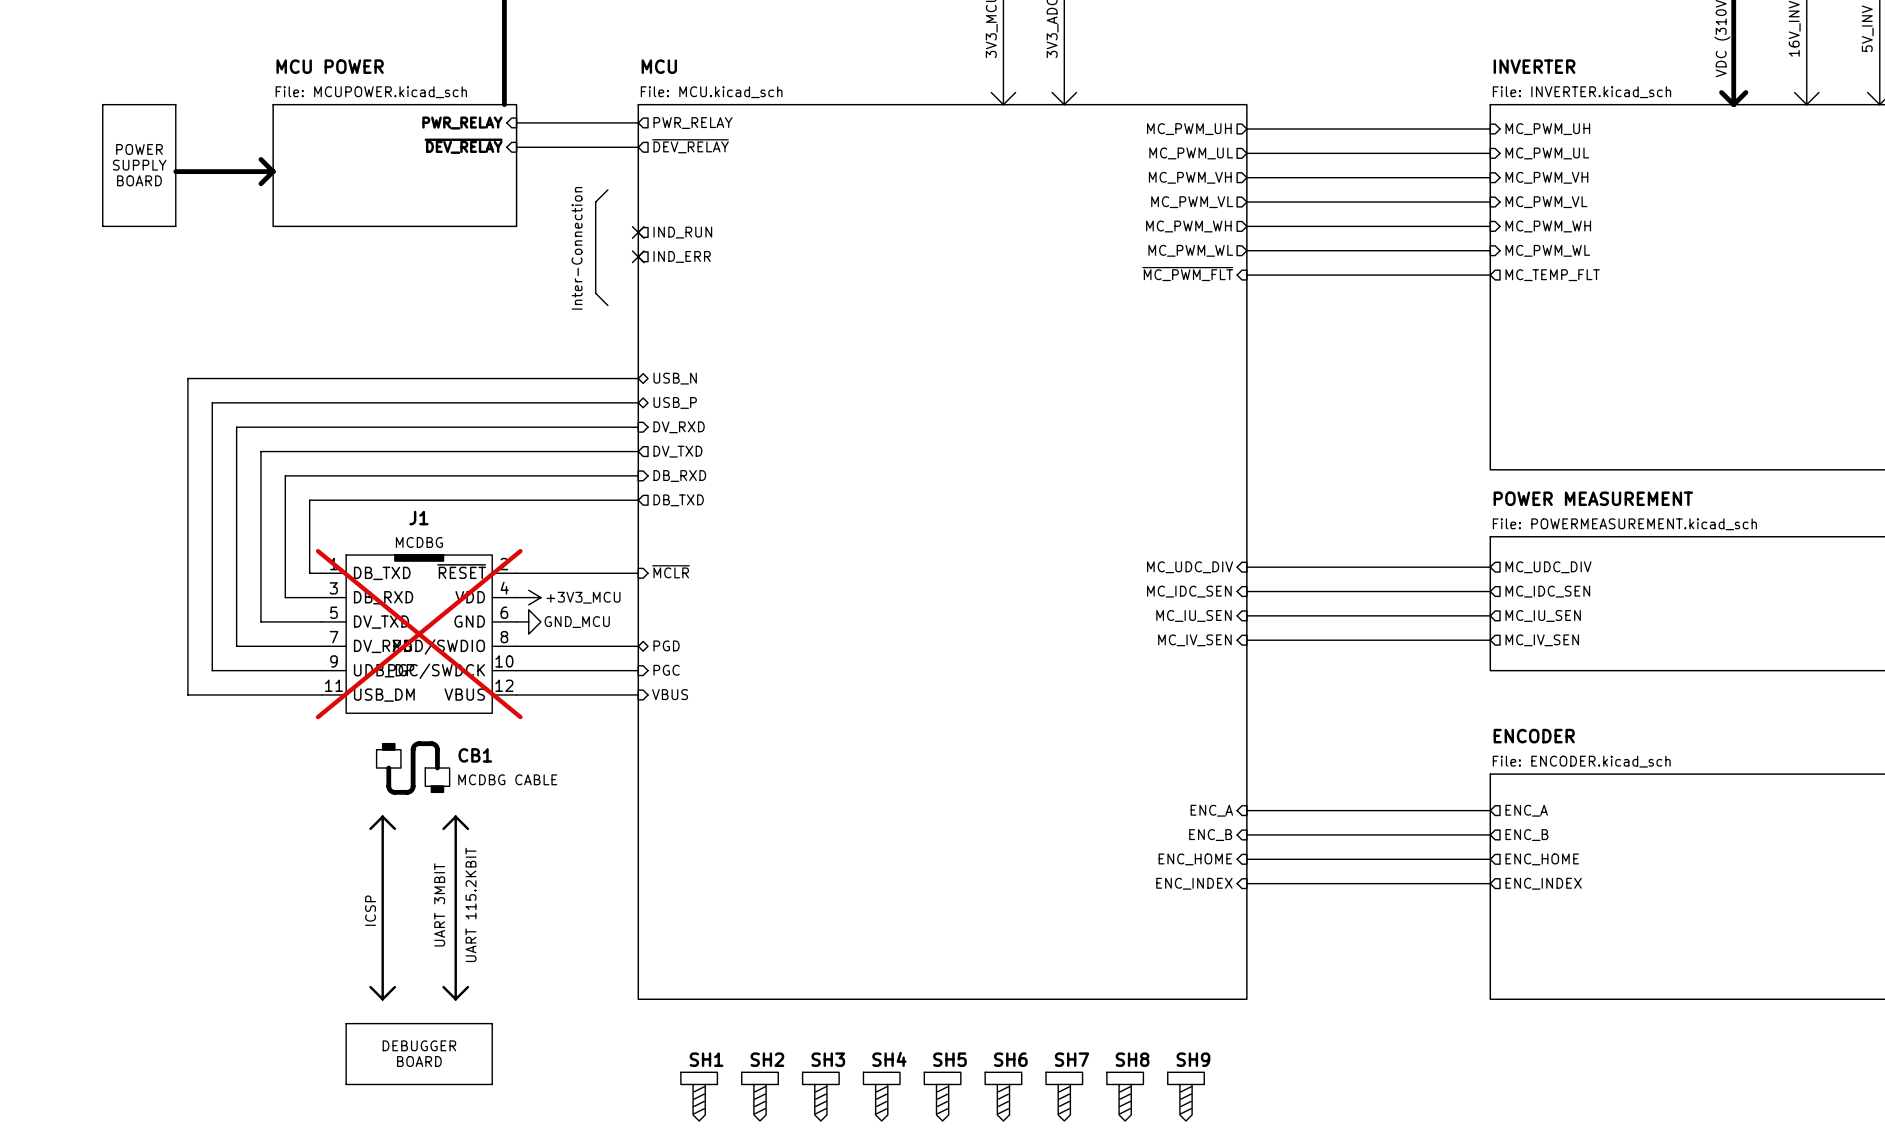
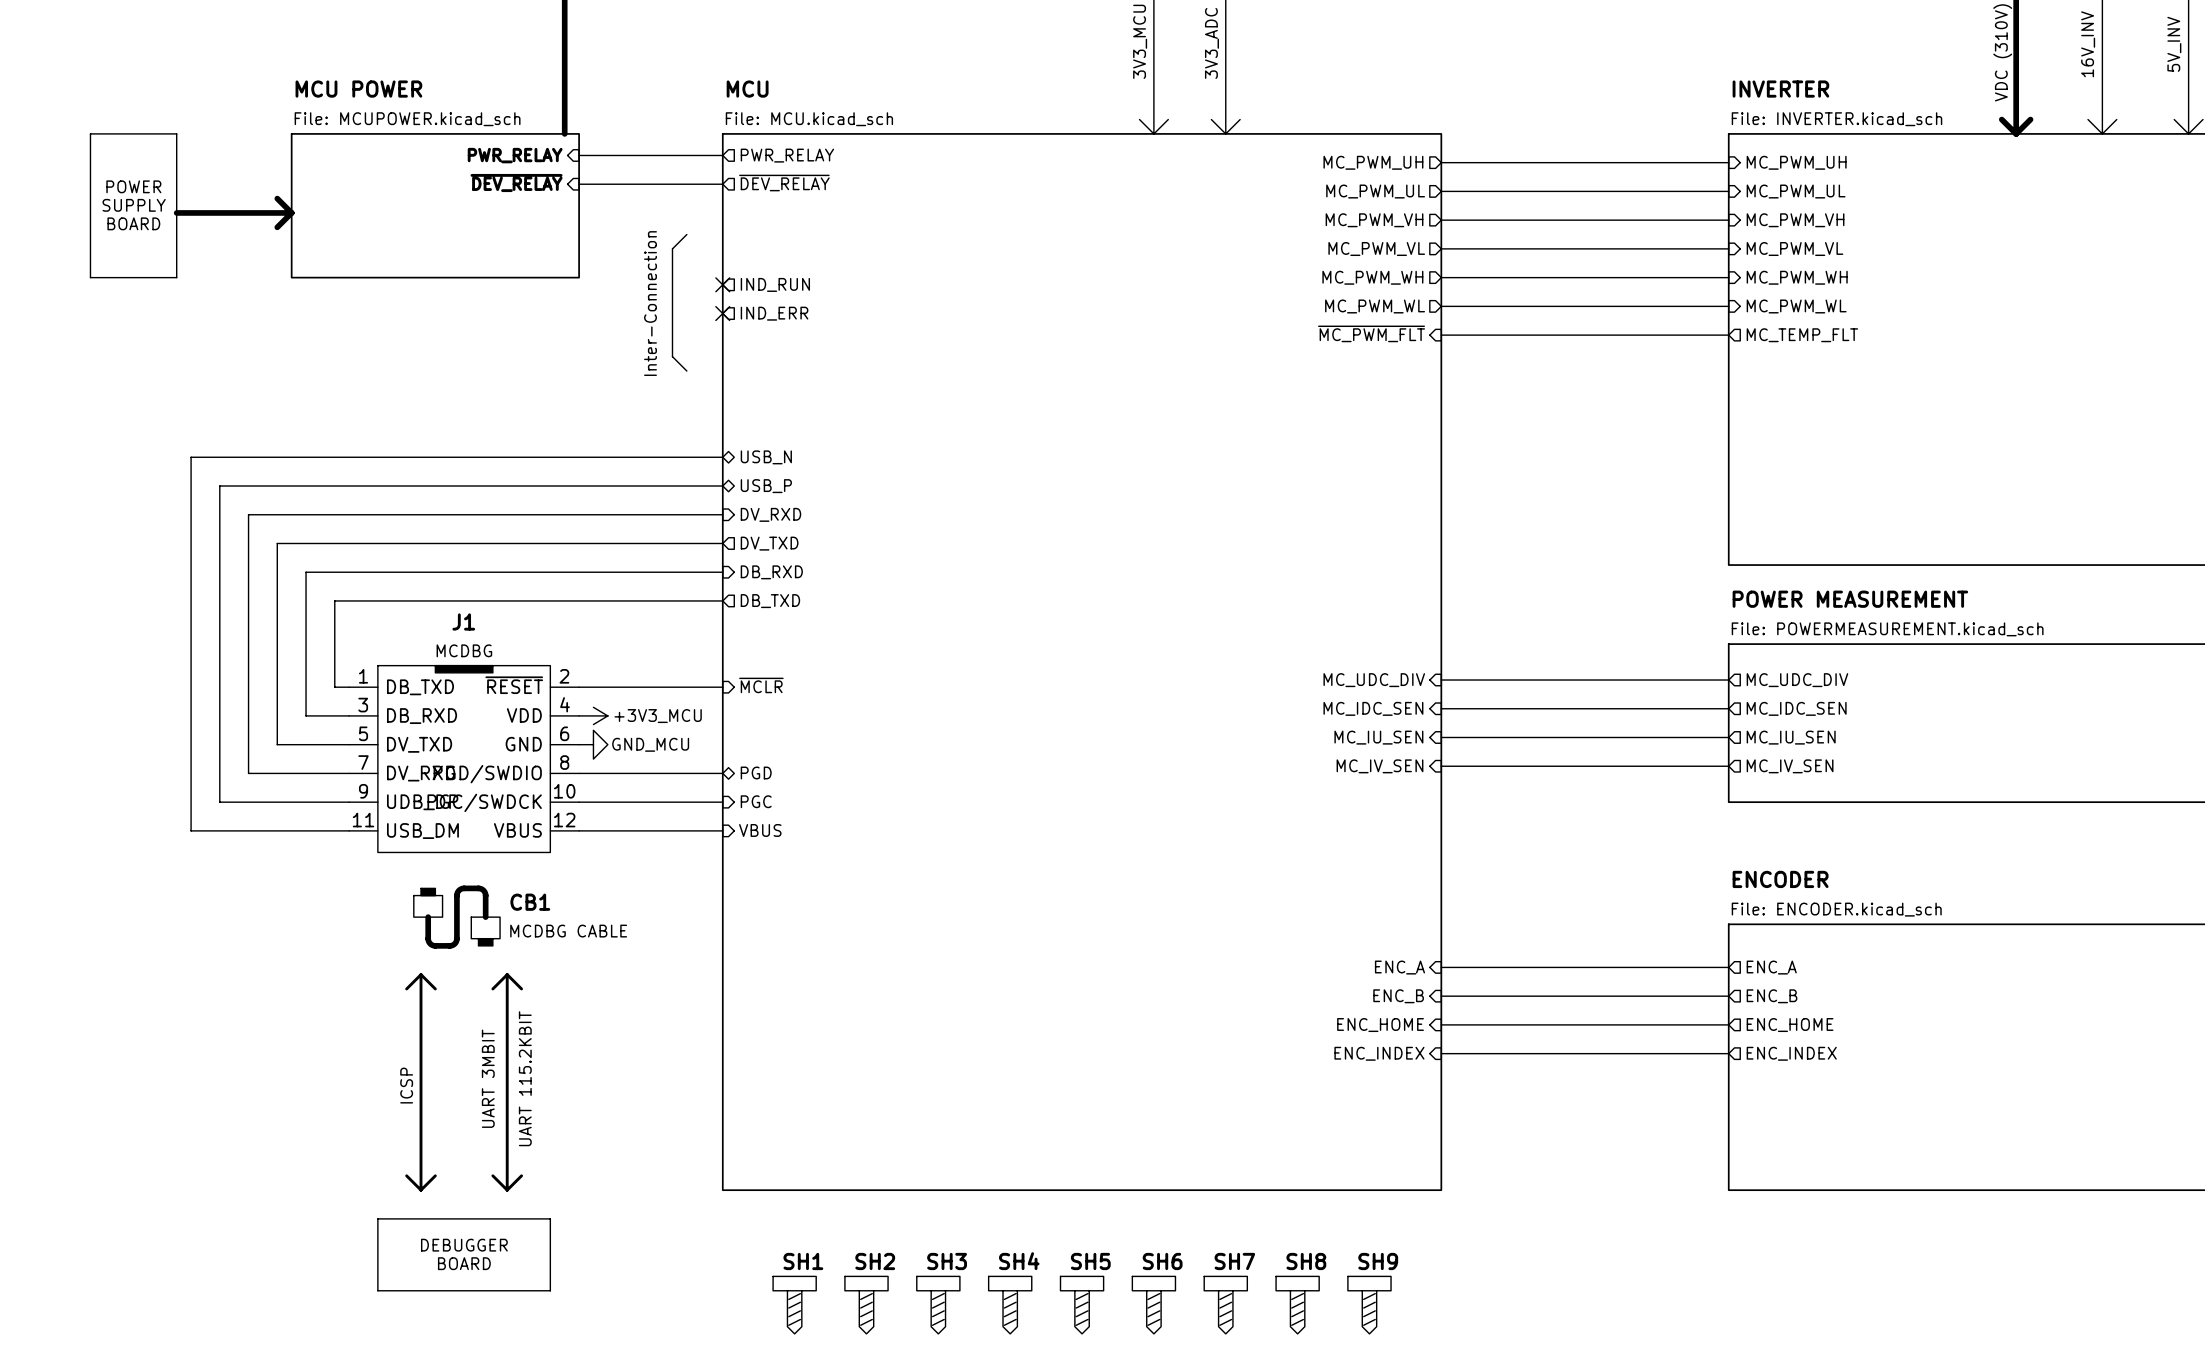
J1 do-not-place cross: (419, 634) -> none

